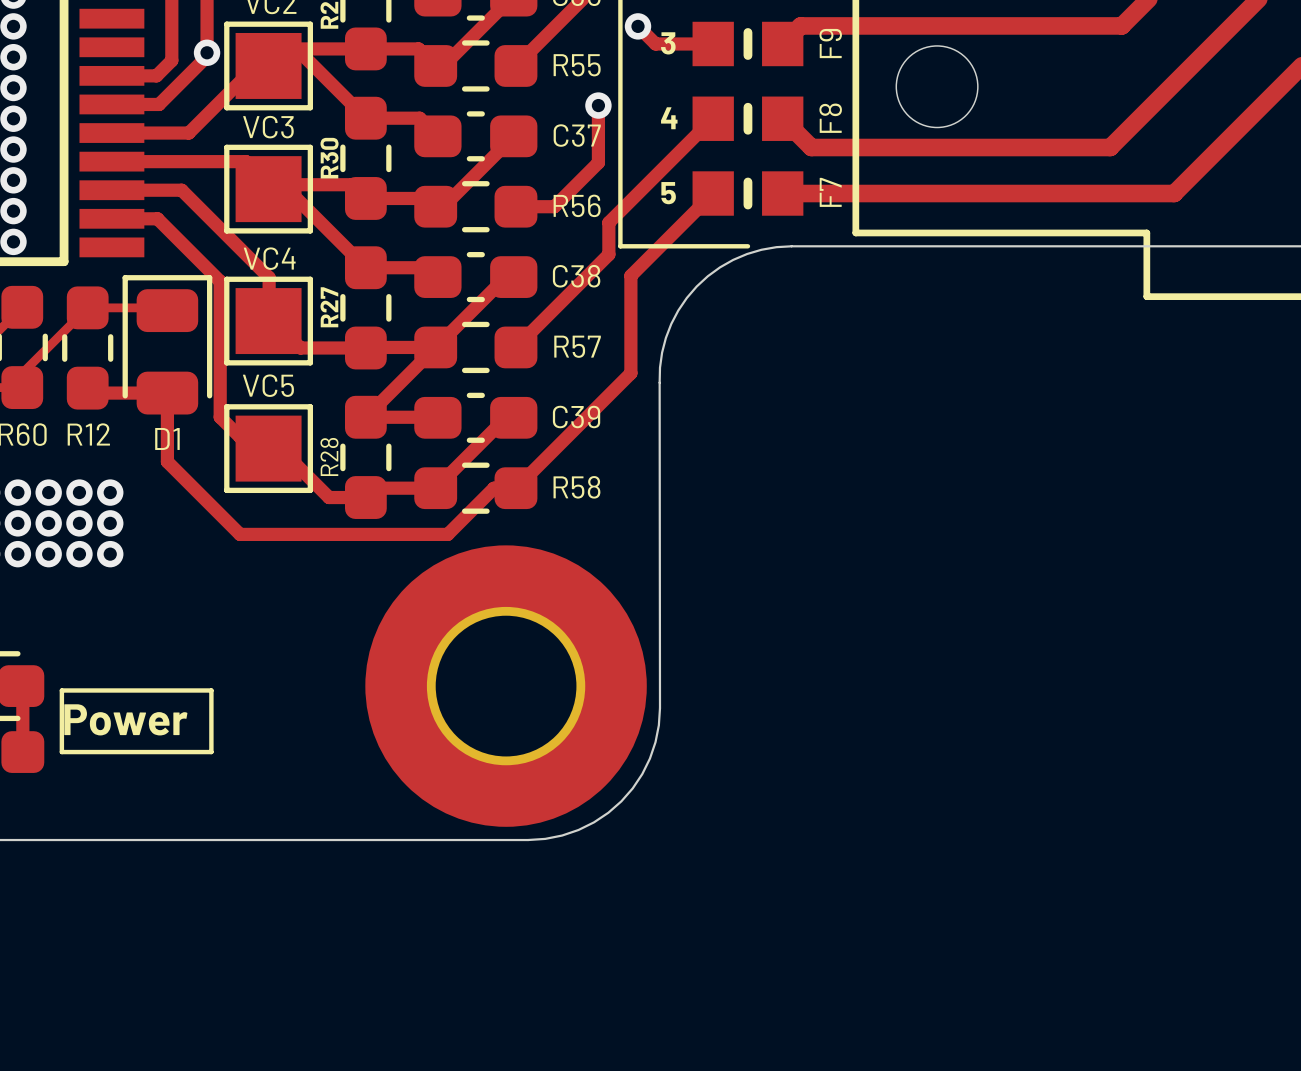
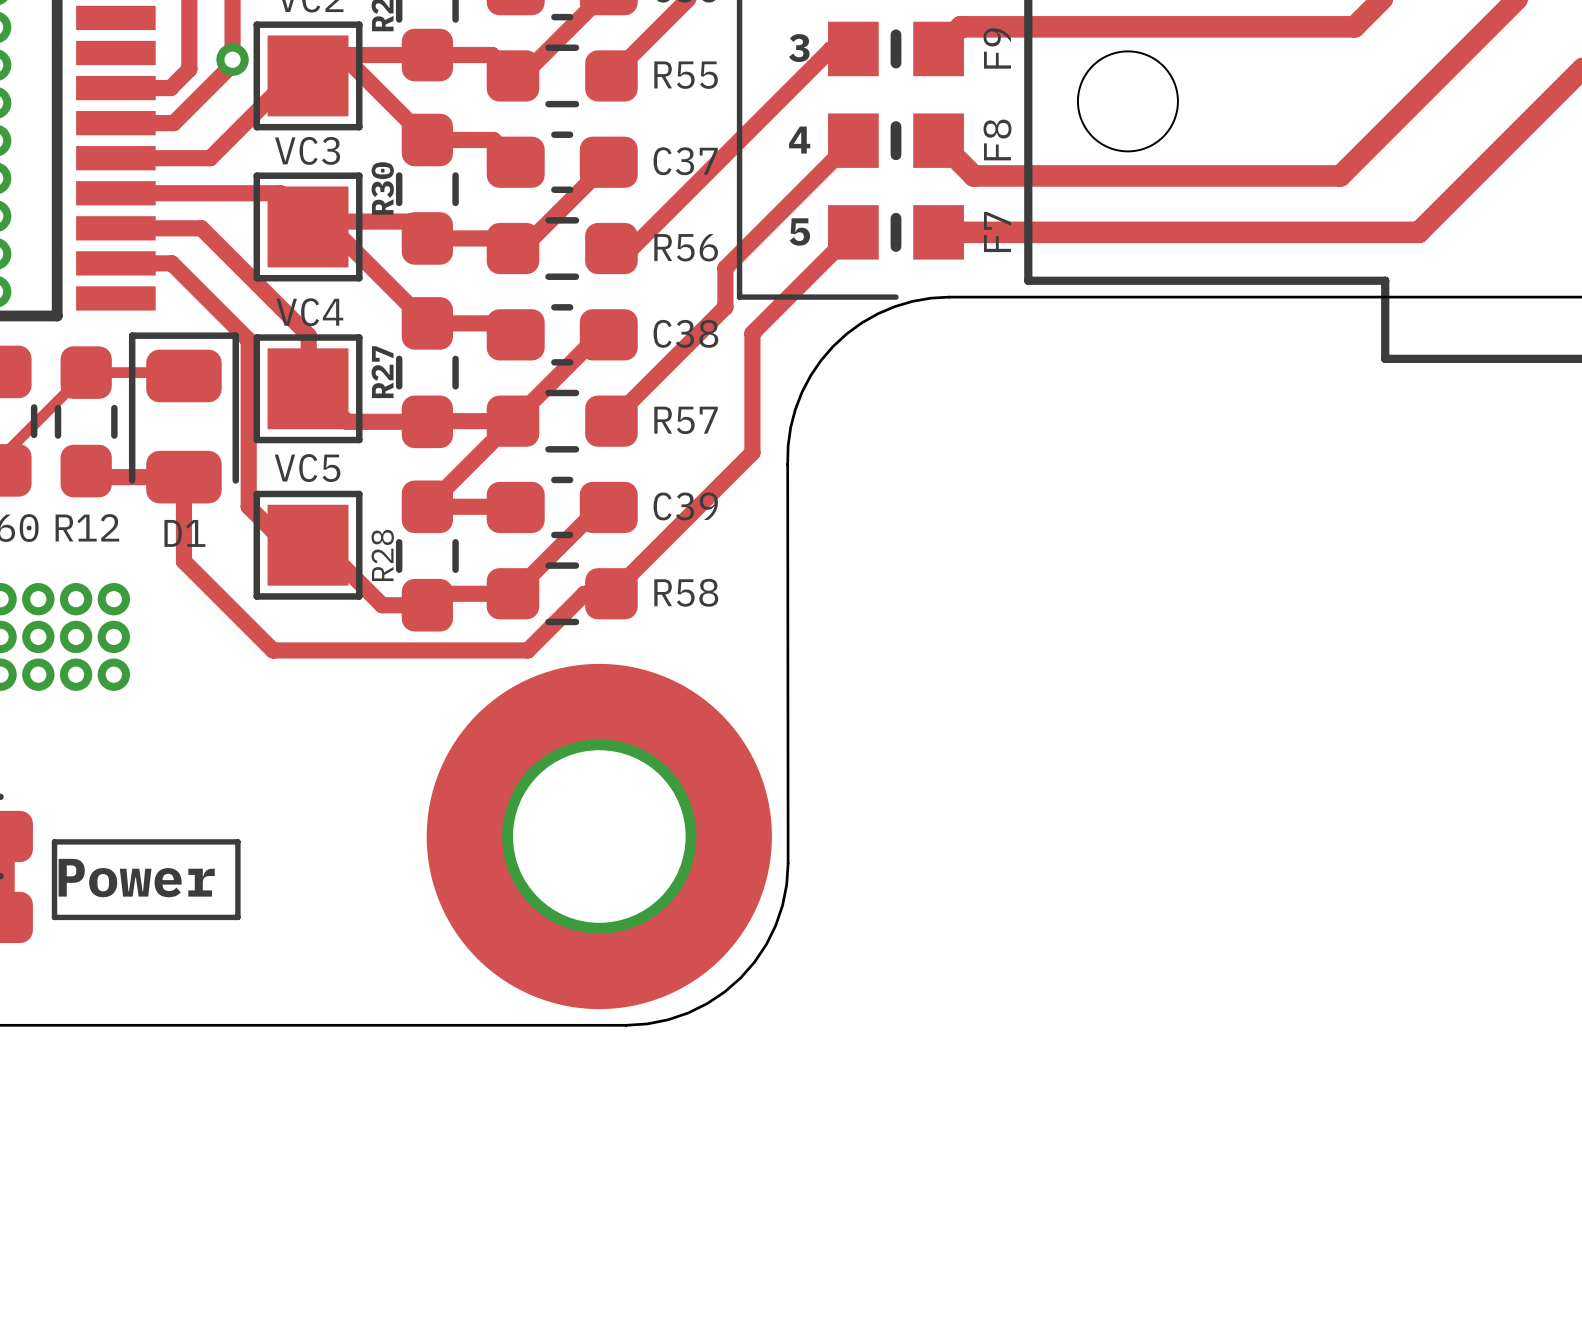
track: (638, 26) (655, 43) (695, 43) -> none
via: (638, 26) -> none
track: (598, 105) (598, 162) (554, 206) (532, 206) -> (831, 48) (631, 248)
via: (598, 105) -> none

